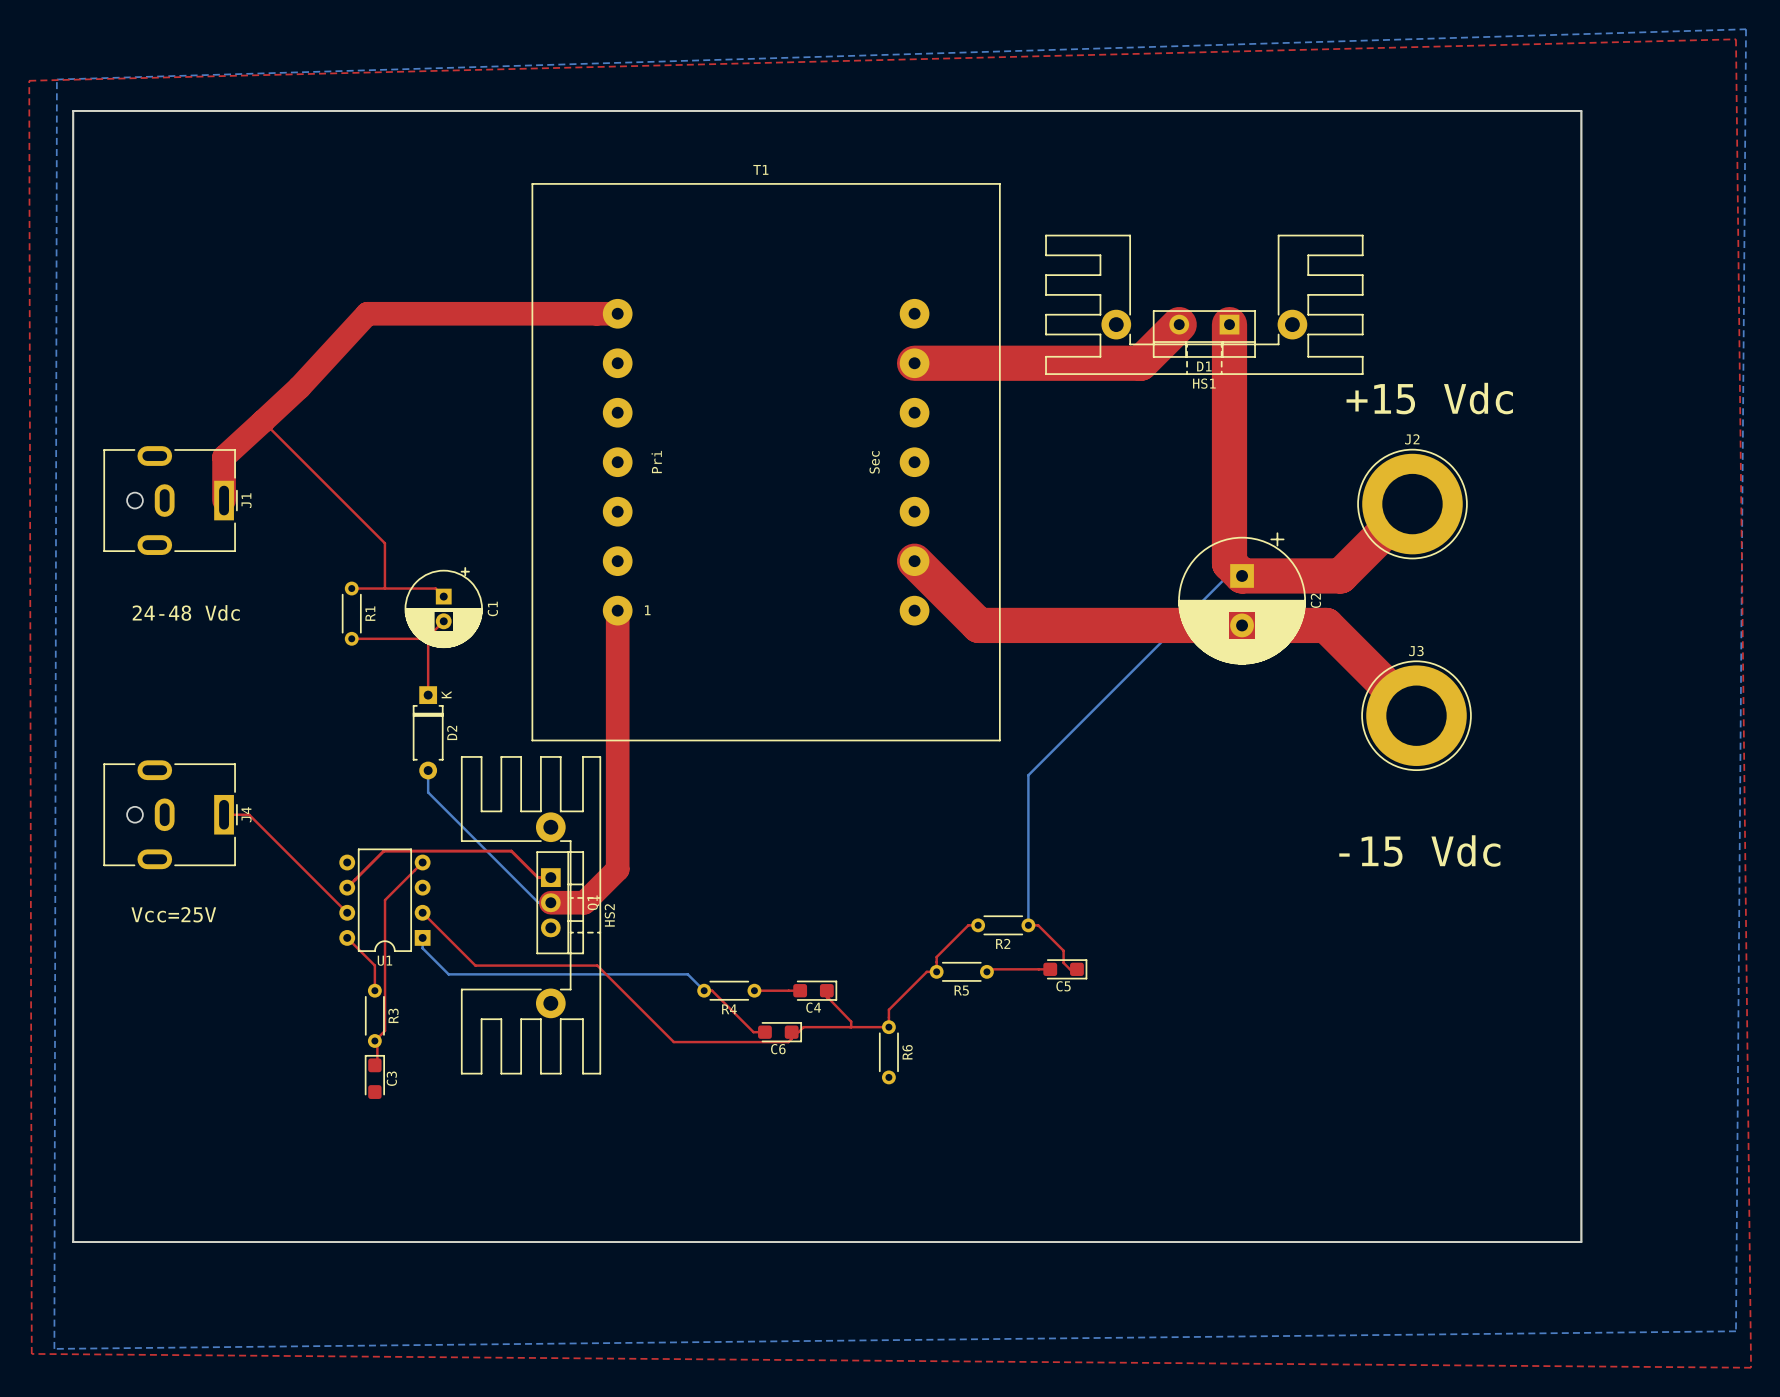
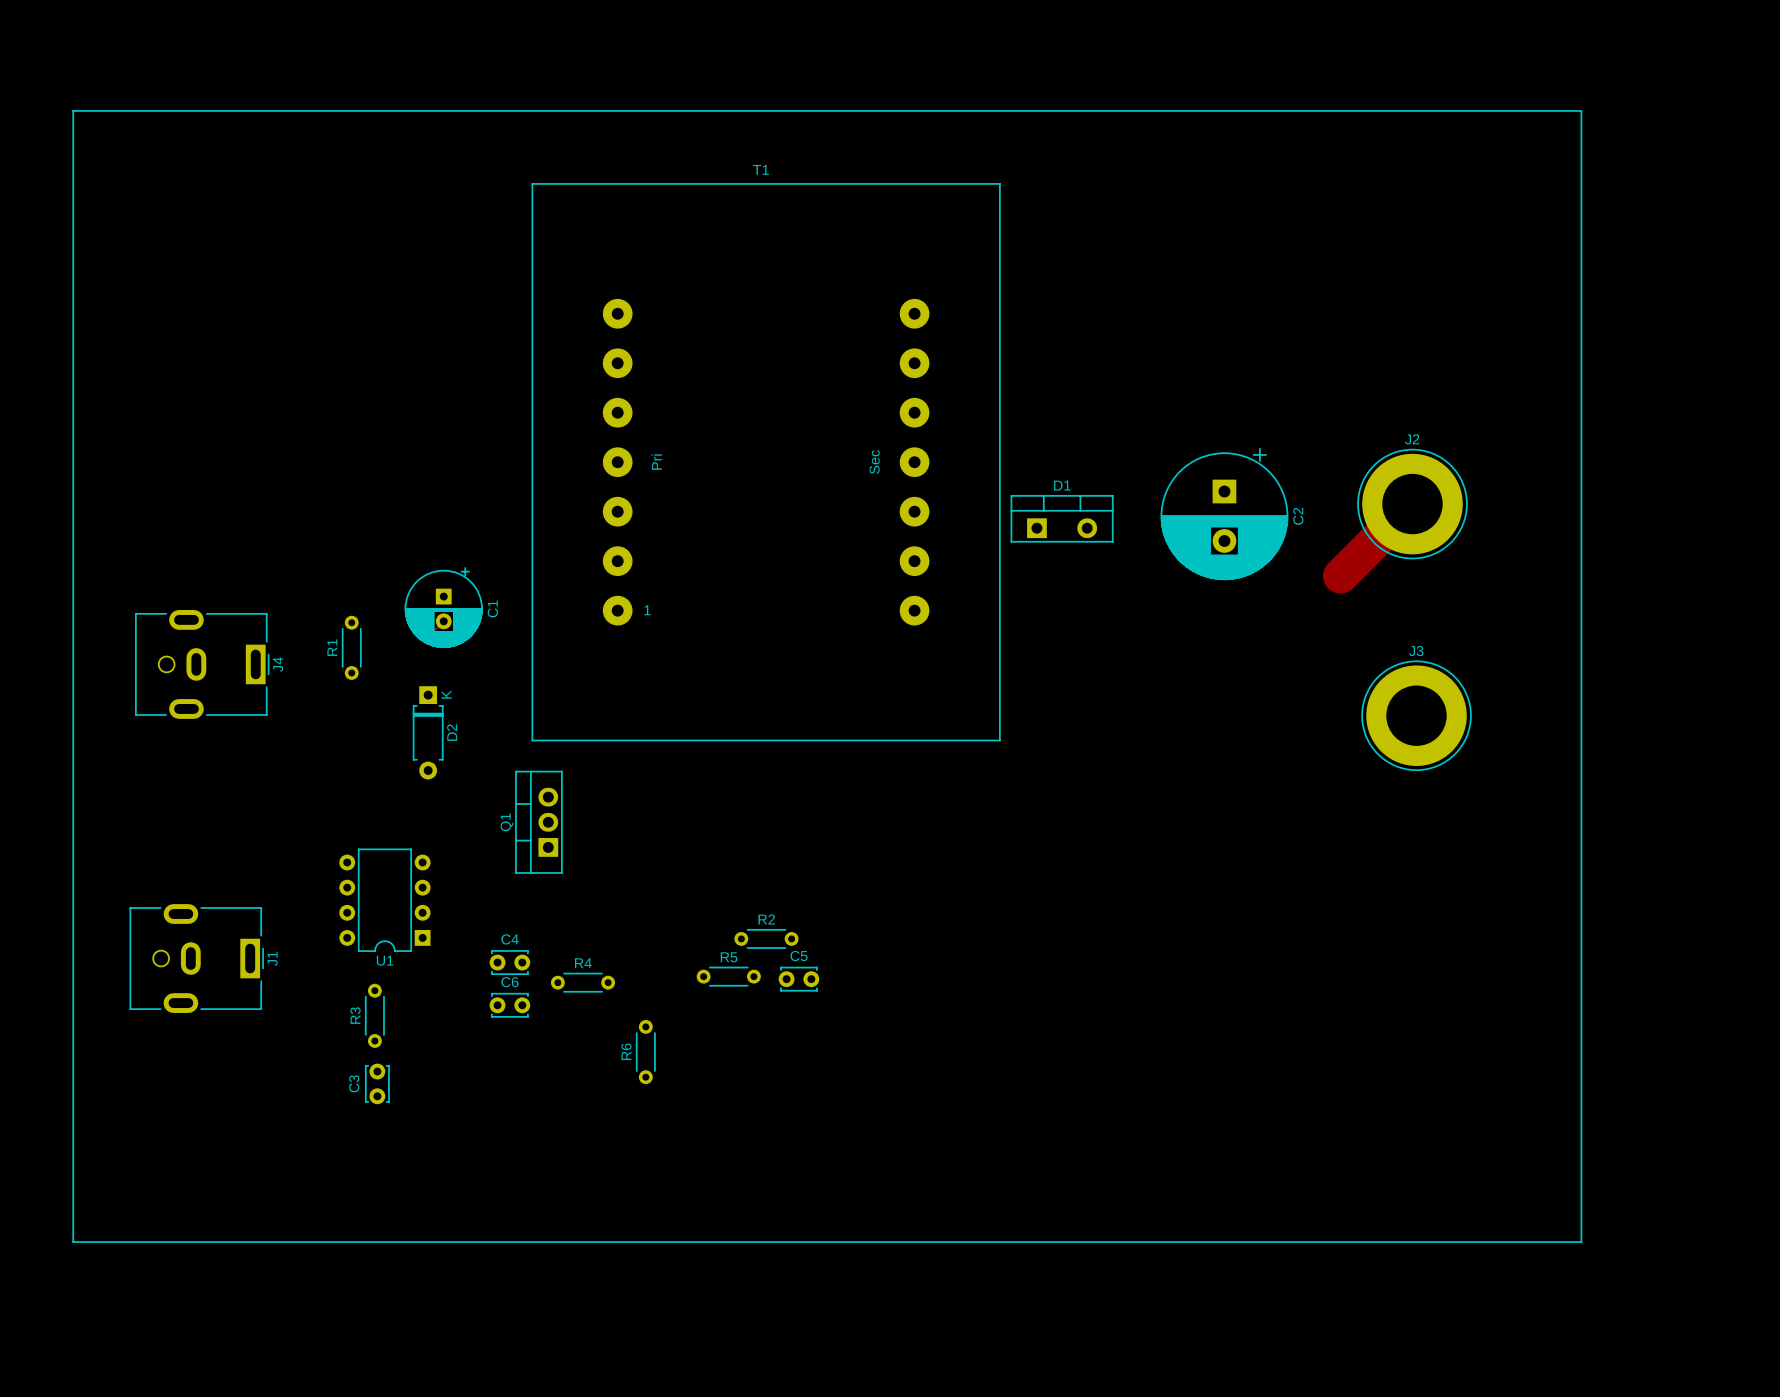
bottom zone outline: (1746, 29) (56, 79) (54, 1348) (1735, 1331) (1746, 29) -> none
top zone outline: (1735, 39) (29, 80) (31, 1353) (1751, 1367) (1735, 39) -> none
board edge: (73, 110) (73, 1242) (1581, 1242) (1581, 110) (73, 110) -> none
HS1: (1204, 304) -> none
top track: (617, 313) (367, 313) (299, 387) (263, 421) -> none
top track: (1179, 324) (1140, 363) (914, 363) -> none
top track: (1229, 324) (1229, 563) (1242, 575) (1355, 575) -> none
D1 rotation: 0° (1204, 334) -> 180° (1062, 518)
D1 position: (1204, 334) -> (1062, 518)
text: +15 Vdc (1429, 398) -> none
top track: (263, 421) (224, 457) (224, 500) -> none
top track: (263, 421) (384, 543) (384, 588) -> none
J1 position: (170, 500) -> (196, 958)
top track: (914, 561) (978, 625) (1326, 625) (1416, 715) -> none
bottom track: (1242, 575) (1227, 575) (1028, 775) (1028, 925) -> none
top track: (351, 588) (435, 588) (443, 596) -> none
C2 position: (1242, 598) -> (1224, 514)
top track: (617, 610) (617, 869) (584, 902) (550, 902) -> none
text: 24-48 Vdc (186, 612) -> none
R1 position: (351, 613) -> (351, 647)
R1 name position: R1 (370, 613) -> R1 (332, 647)
top track: (428, 636) (428, 695) -> none
top track: (351, 638) (426, 638) -> none
bottom track: (428, 770) (428, 792) (538, 902) (550, 902) -> none
J4 position: (170, 814) -> (202, 664)
top track: (224, 814) (249, 814) (347, 912) -> none
text: -15 Vdc (1419, 851) -> none
top track: (422, 862) (385, 900) (385, 1030) (374, 1040) (377, 1043) (377, 1066) -> none
top track: (550, 877) (537, 877) (511, 851) (383, 851) (347, 887) -> none
Q1 rotation: 0° (560, 902) -> 180° (538, 822)
Q1 position: (560, 902) -> (538, 822)
top track: (422, 912) (475, 965) (597, 965) (673, 1042) (788, 1042) (791, 1038) (791, 1032) (798, 1032) (803, 1027) (888, 1027) (888, 1009) (926, 971) (936, 971) (936, 957) (968, 925) (978, 925) -> none
text: Vcc=25V (173, 914) -> none
HS2: (531, 915) -> none
R2 position: (1003, 925) -> (766, 938)
top track: (1028, 925) (1038, 925) (1063, 950) (1063, 962) (1070, 969) (1076, 969) -> none
top track: (347, 937) (374, 965) (374, 990) -> none
bottom track: (422, 937) (422, 948) (448, 974) (687, 974) (704, 990) -> none
R2 name position: R2 (1003, 943) -> R2 (766, 919)
C5 footprint: [1043, 959, 1088, 980] -> [778, 966, 820, 992]
top track: (1050, 969) (989, 969) (986, 971) -> none
R5 position: (961, 971) -> (728, 976)
C4 footprint: [793, 980, 837, 1001] -> [489, 950, 531, 975]
C5 name position: C5 (1063, 986) -> C5 (799, 956)
top track: (704, 990) (712, 990) (753, 1032) (764, 1032) -> none
R4 position: (729, 990) -> (583, 982)
top track: (754, 990) (800, 990) -> none
top track: (826, 990) (826, 997) (851, 1021) (851, 1027) -> none
R5 name position: R5 (961, 990) -> R5 (729, 957)
C4 name position: C4 (813, 1007) -> C4 (510, 939)
R4 name position: R4 (729, 1009) -> R4 (583, 963)
R3 name position: R3 (393, 1015) -> R3 (355, 1015)
C6 footprint: [758, 1022, 802, 1043] -> [489, 993, 531, 1018]
C6 name position: C6 (778, 1049) -> C6 (509, 982)
R6 position: (888, 1052) -> (645, 1052)
R6 name position: R6 (907, 1052) -> R6 (626, 1051)
C3 footprint: [365, 1055, 385, 1099] -> [365, 1063, 390, 1105]
C3 name position: C3 (391, 1078) -> C3 (354, 1083)

